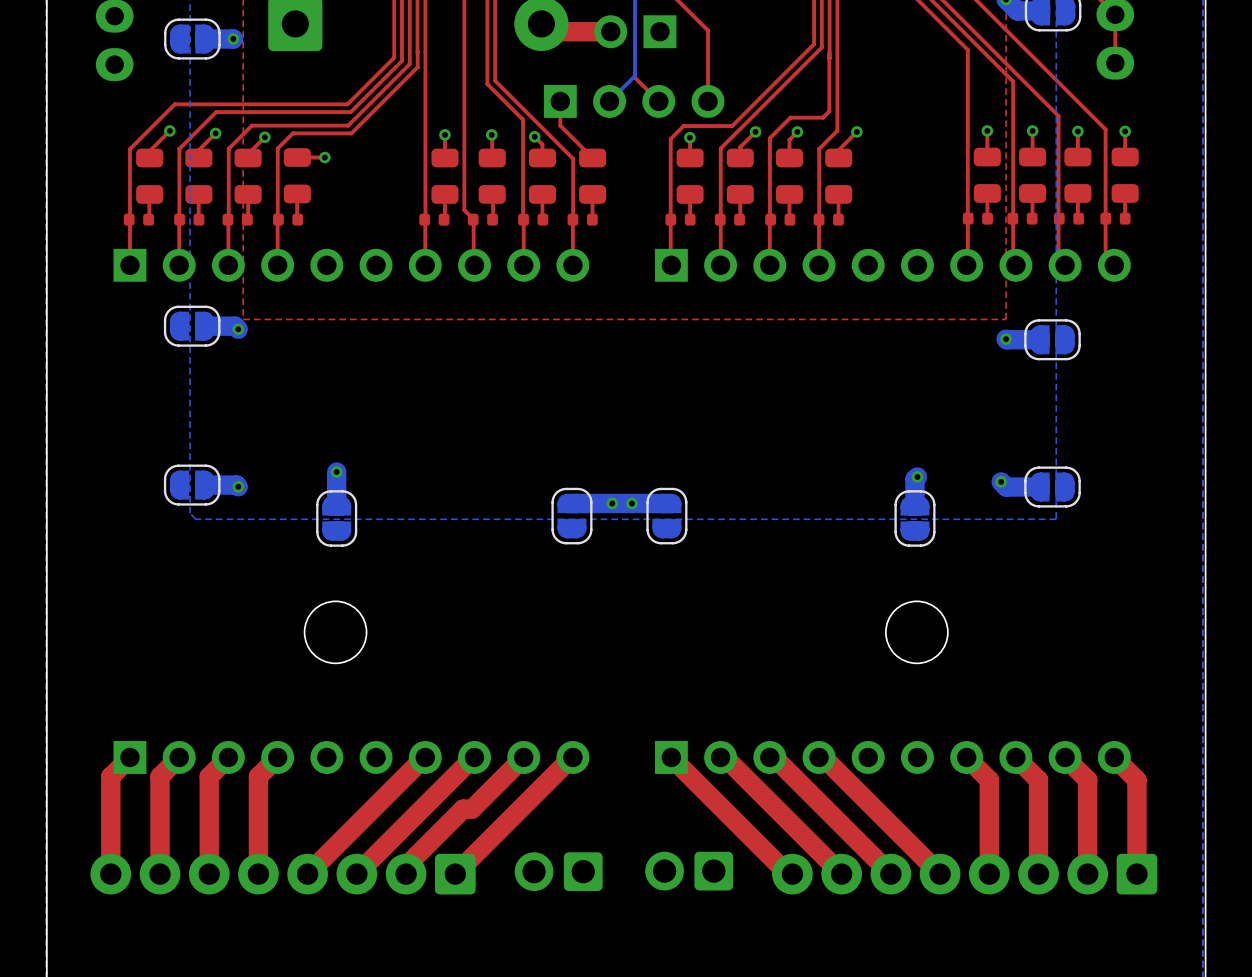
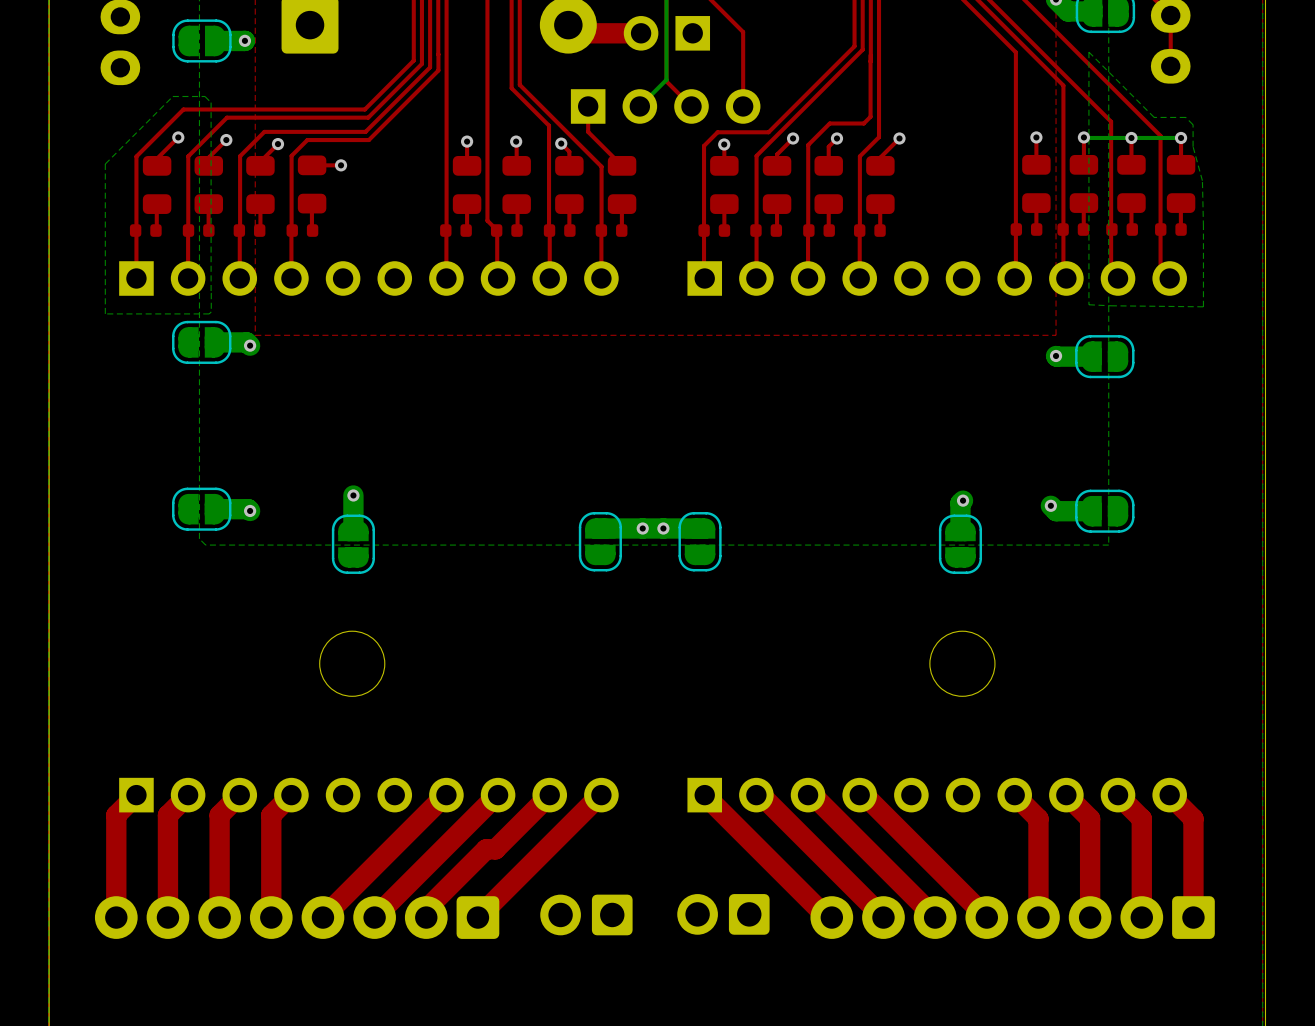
bottom zone outline: none -> (1088, 52) (1154, 117) (1185, 117) (1193, 124) (1193, 146) (1202, 180) (1203, 306) (1088, 304) (1088, 52)
bottom track: none -> (1181, 137) (1084, 137)
bottom zone outline: none -> (211, 293) (211, 311) (209, 313) (105, 313) (105, 164) (172, 96) (204, 96) (211, 102) (211, 293)

